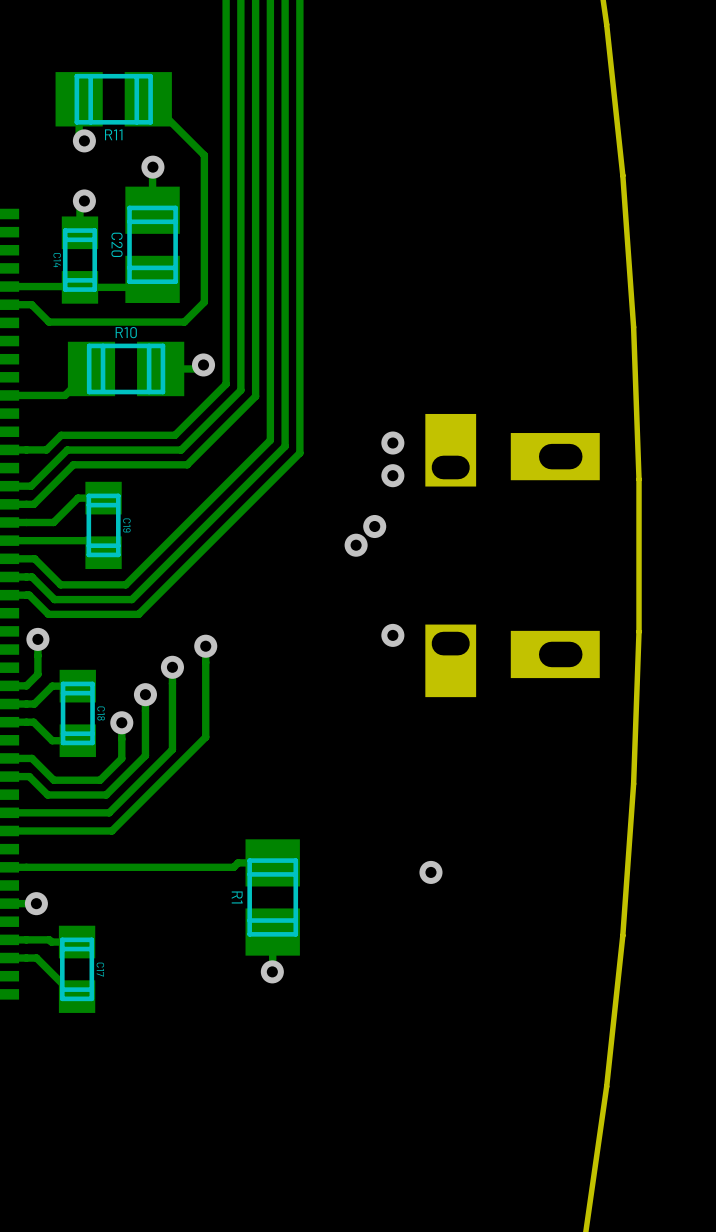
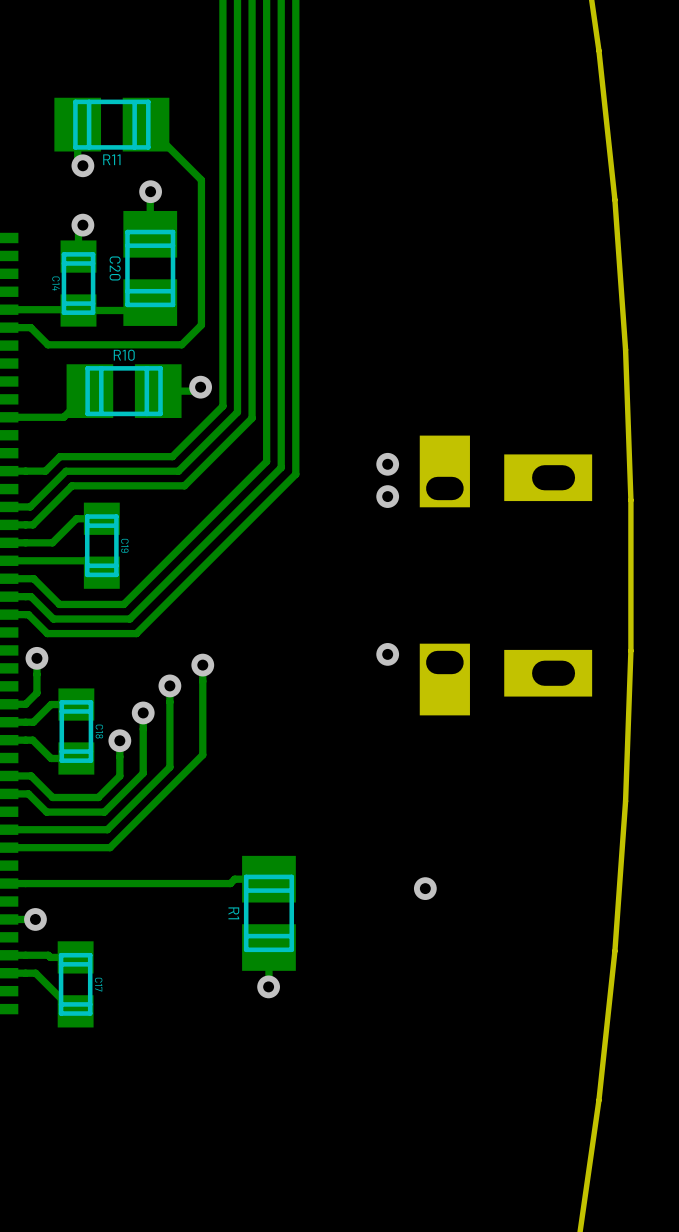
via: (374, 526) -> none
via: (356, 545) -> none

